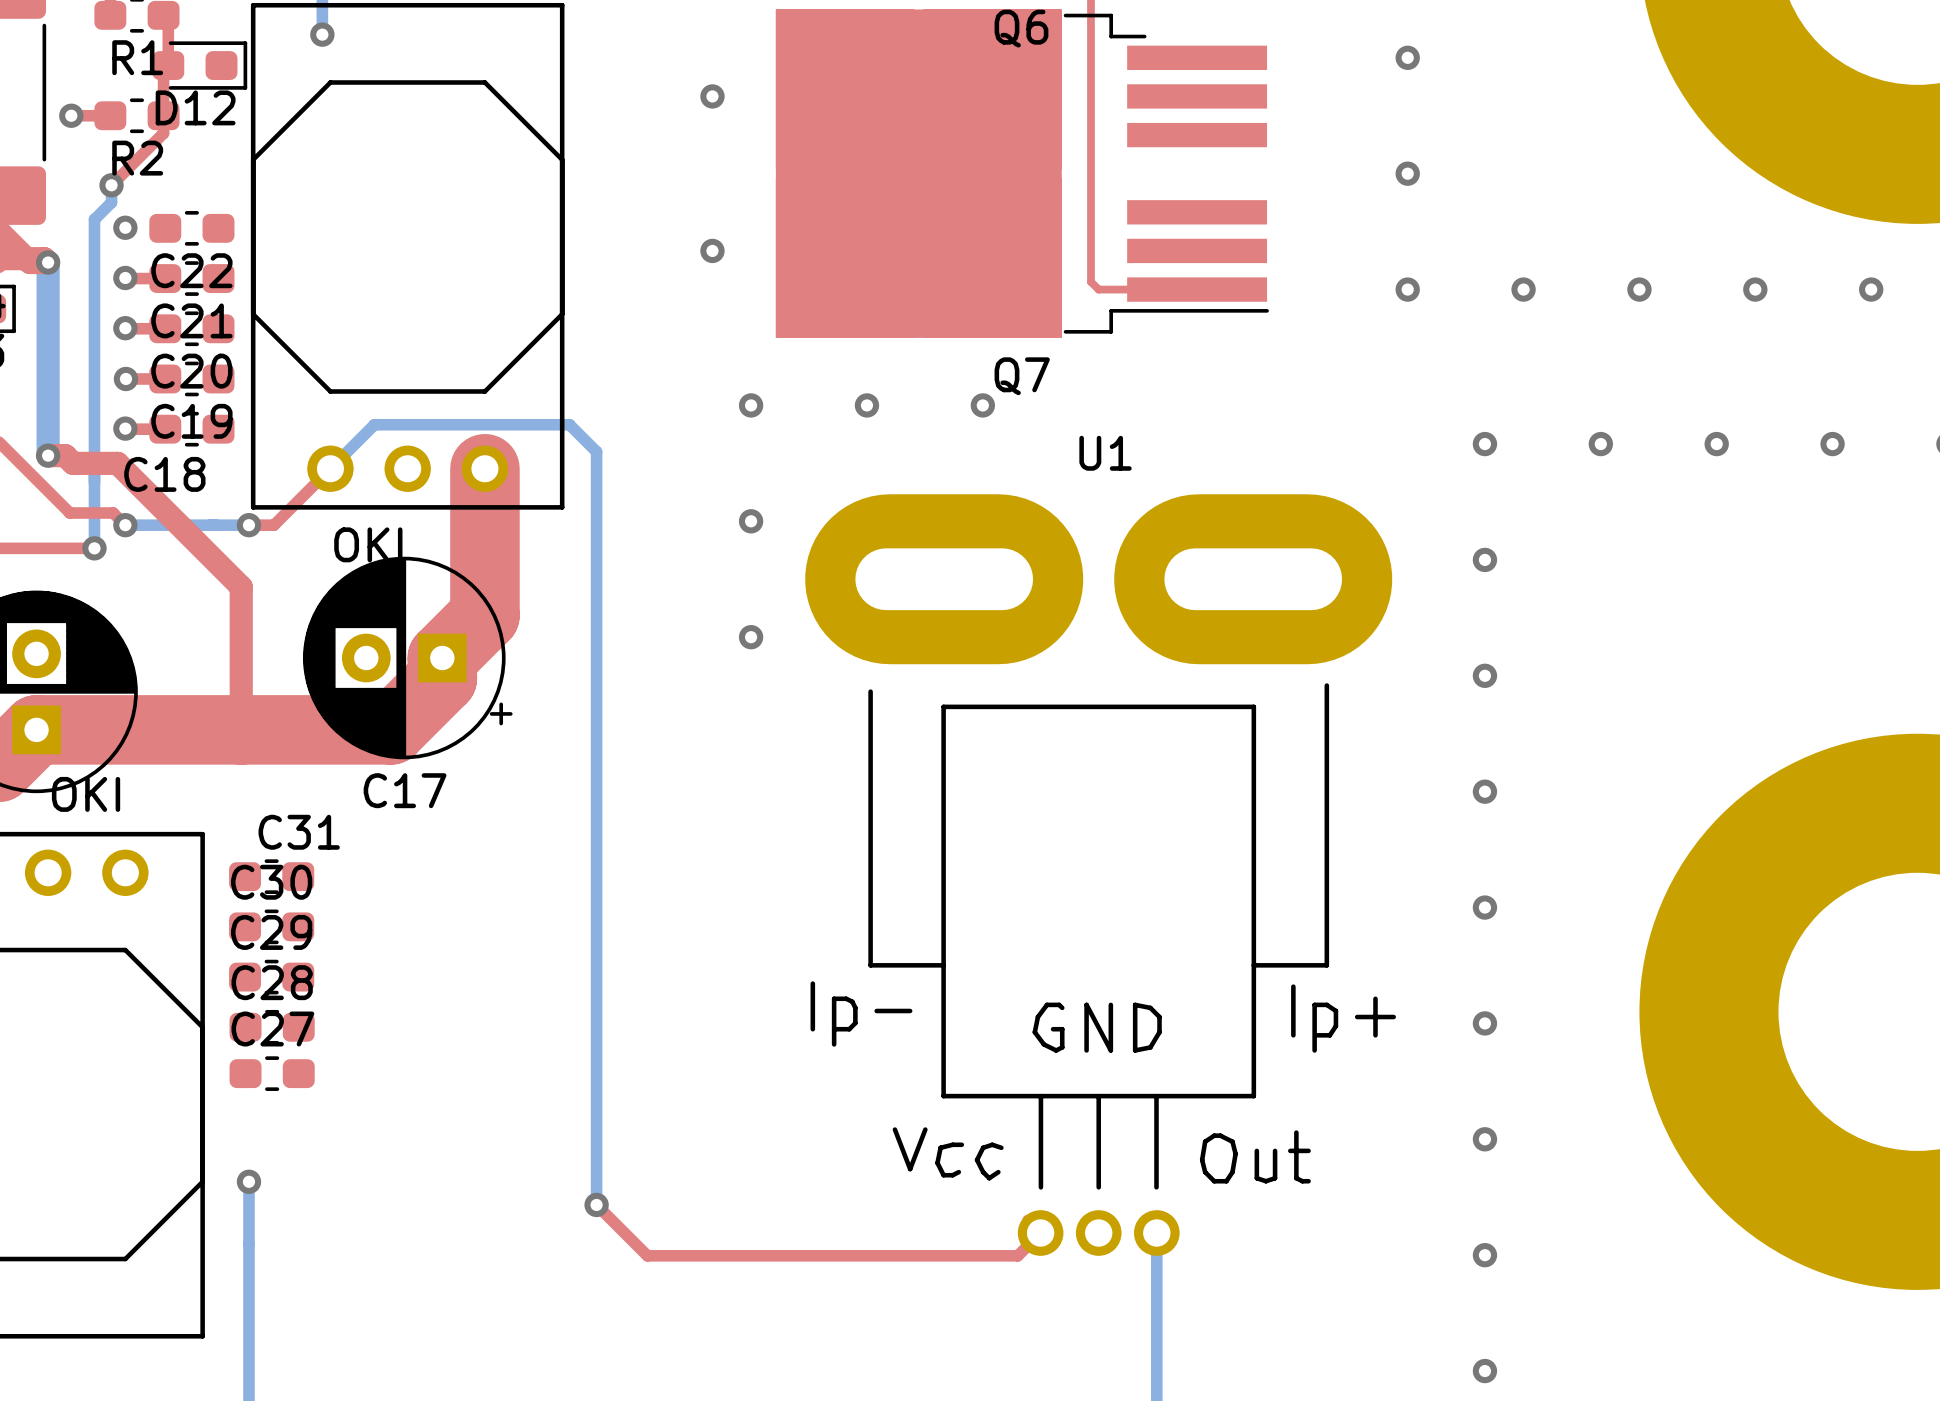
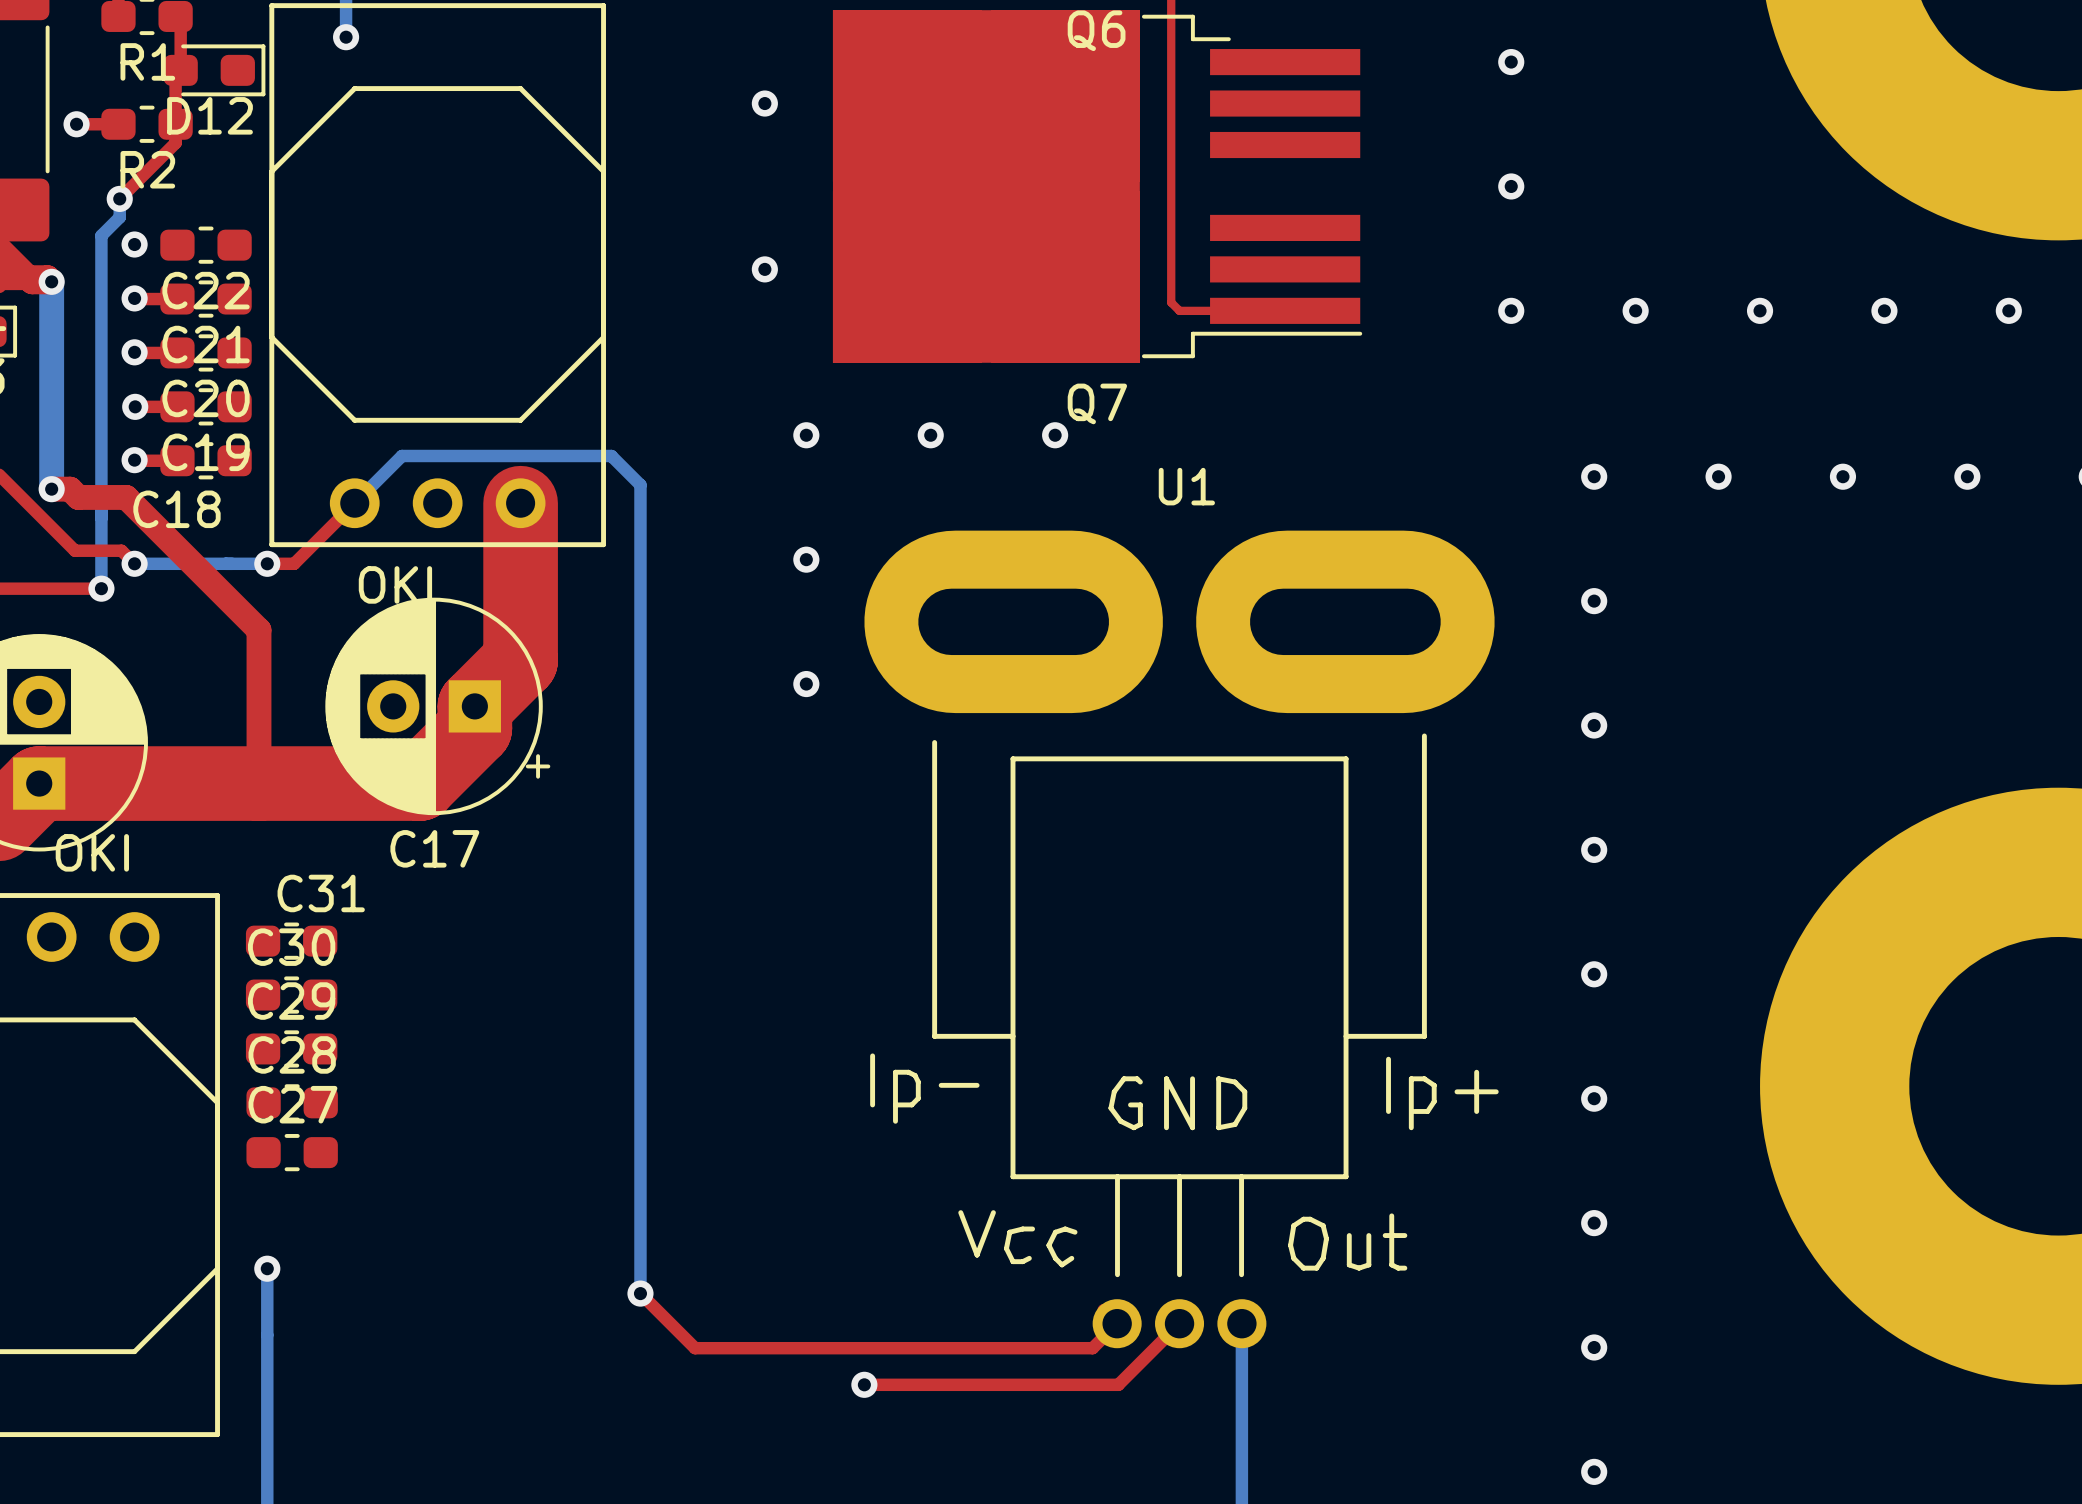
top track: none -> (1179, 1323) (1118, 1384) (864, 1384)
via: none -> (864, 1384)

